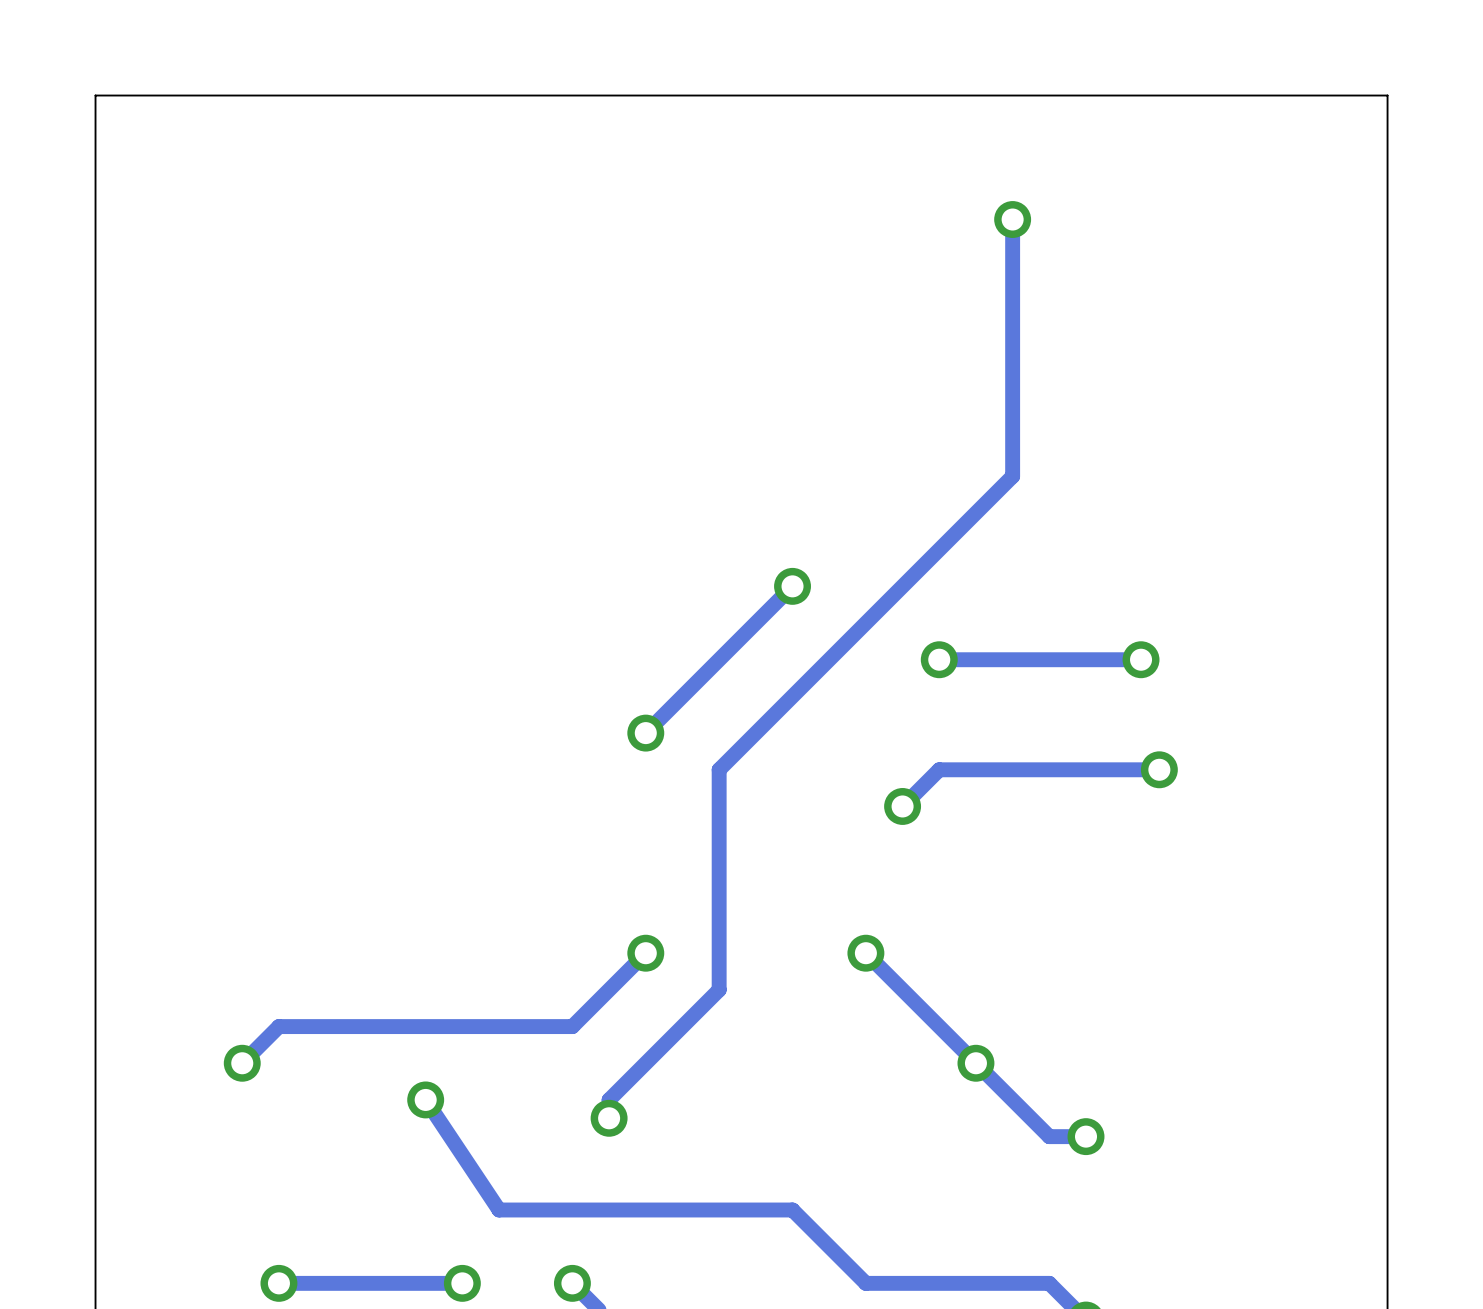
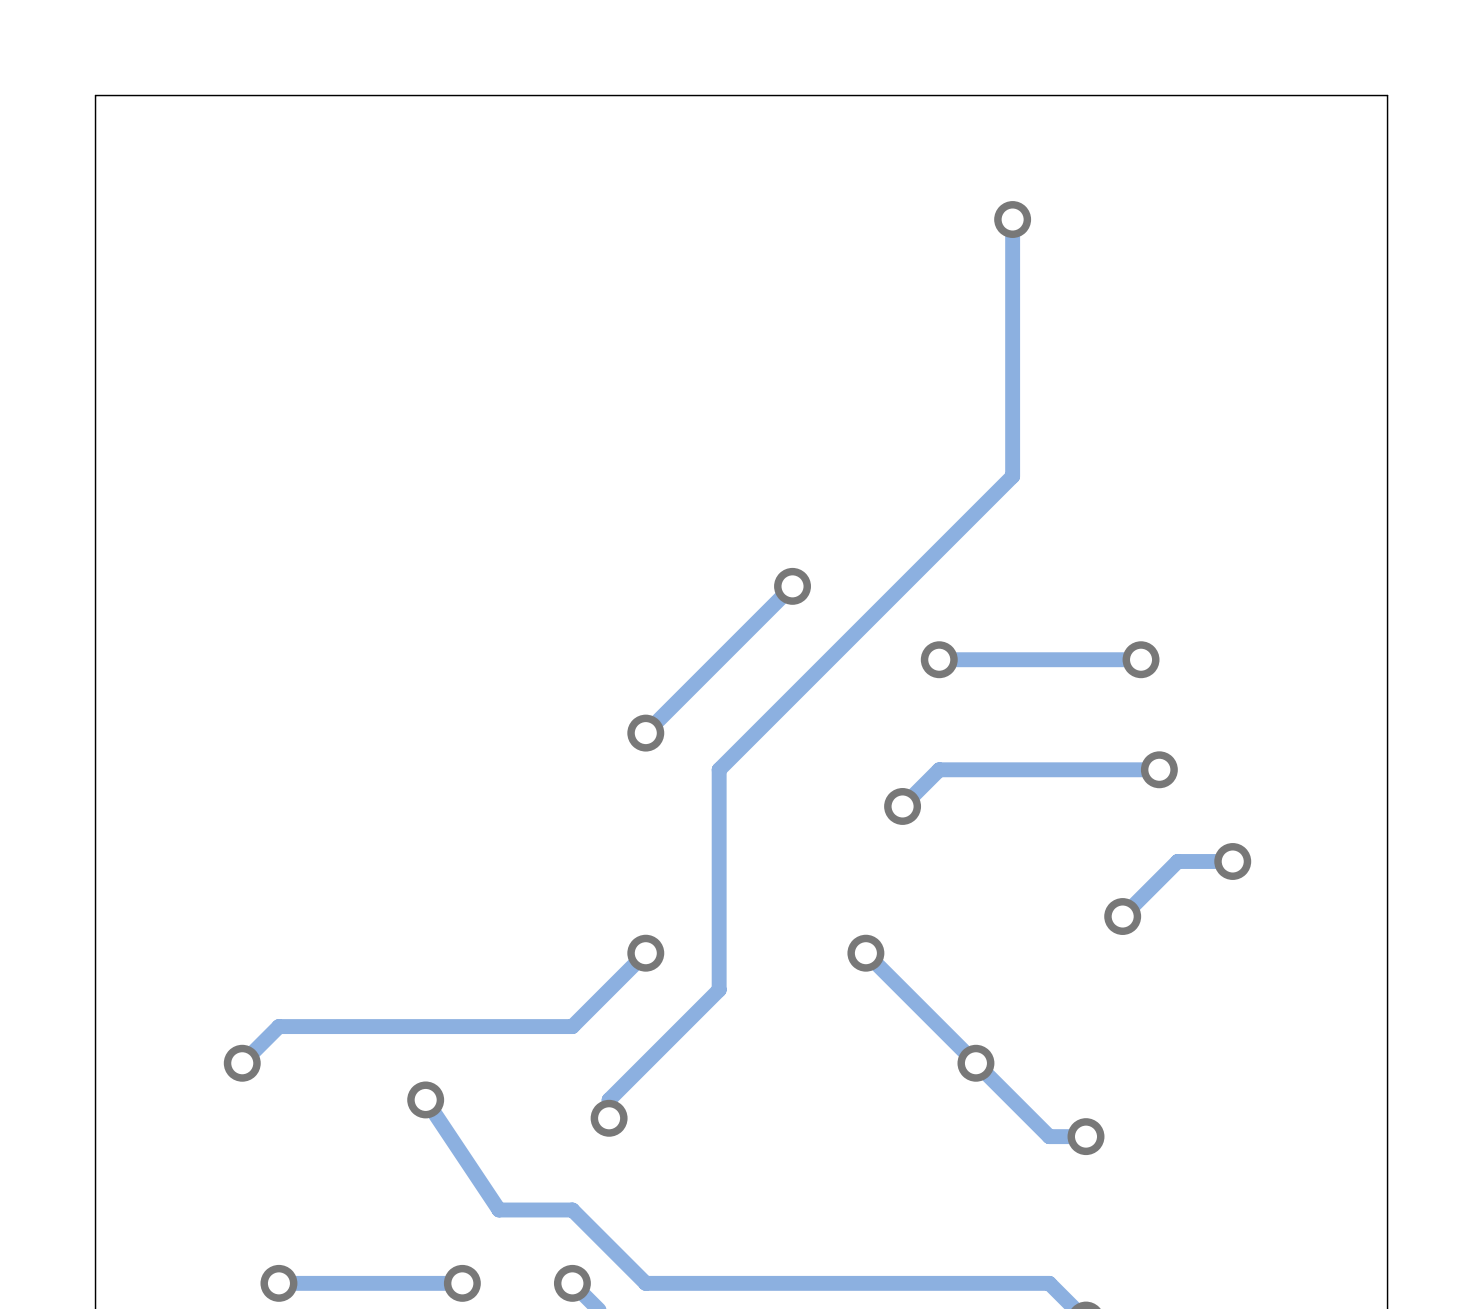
track: none -> (1232, 861) (1177, 861) (1122, 916)
via: none -> (1232, 861)
via: none -> (1122, 916)
track: (572, 1209) (792, 1209) (865, 1283) -> (572, 1209) (645, 1283) (865, 1283)

